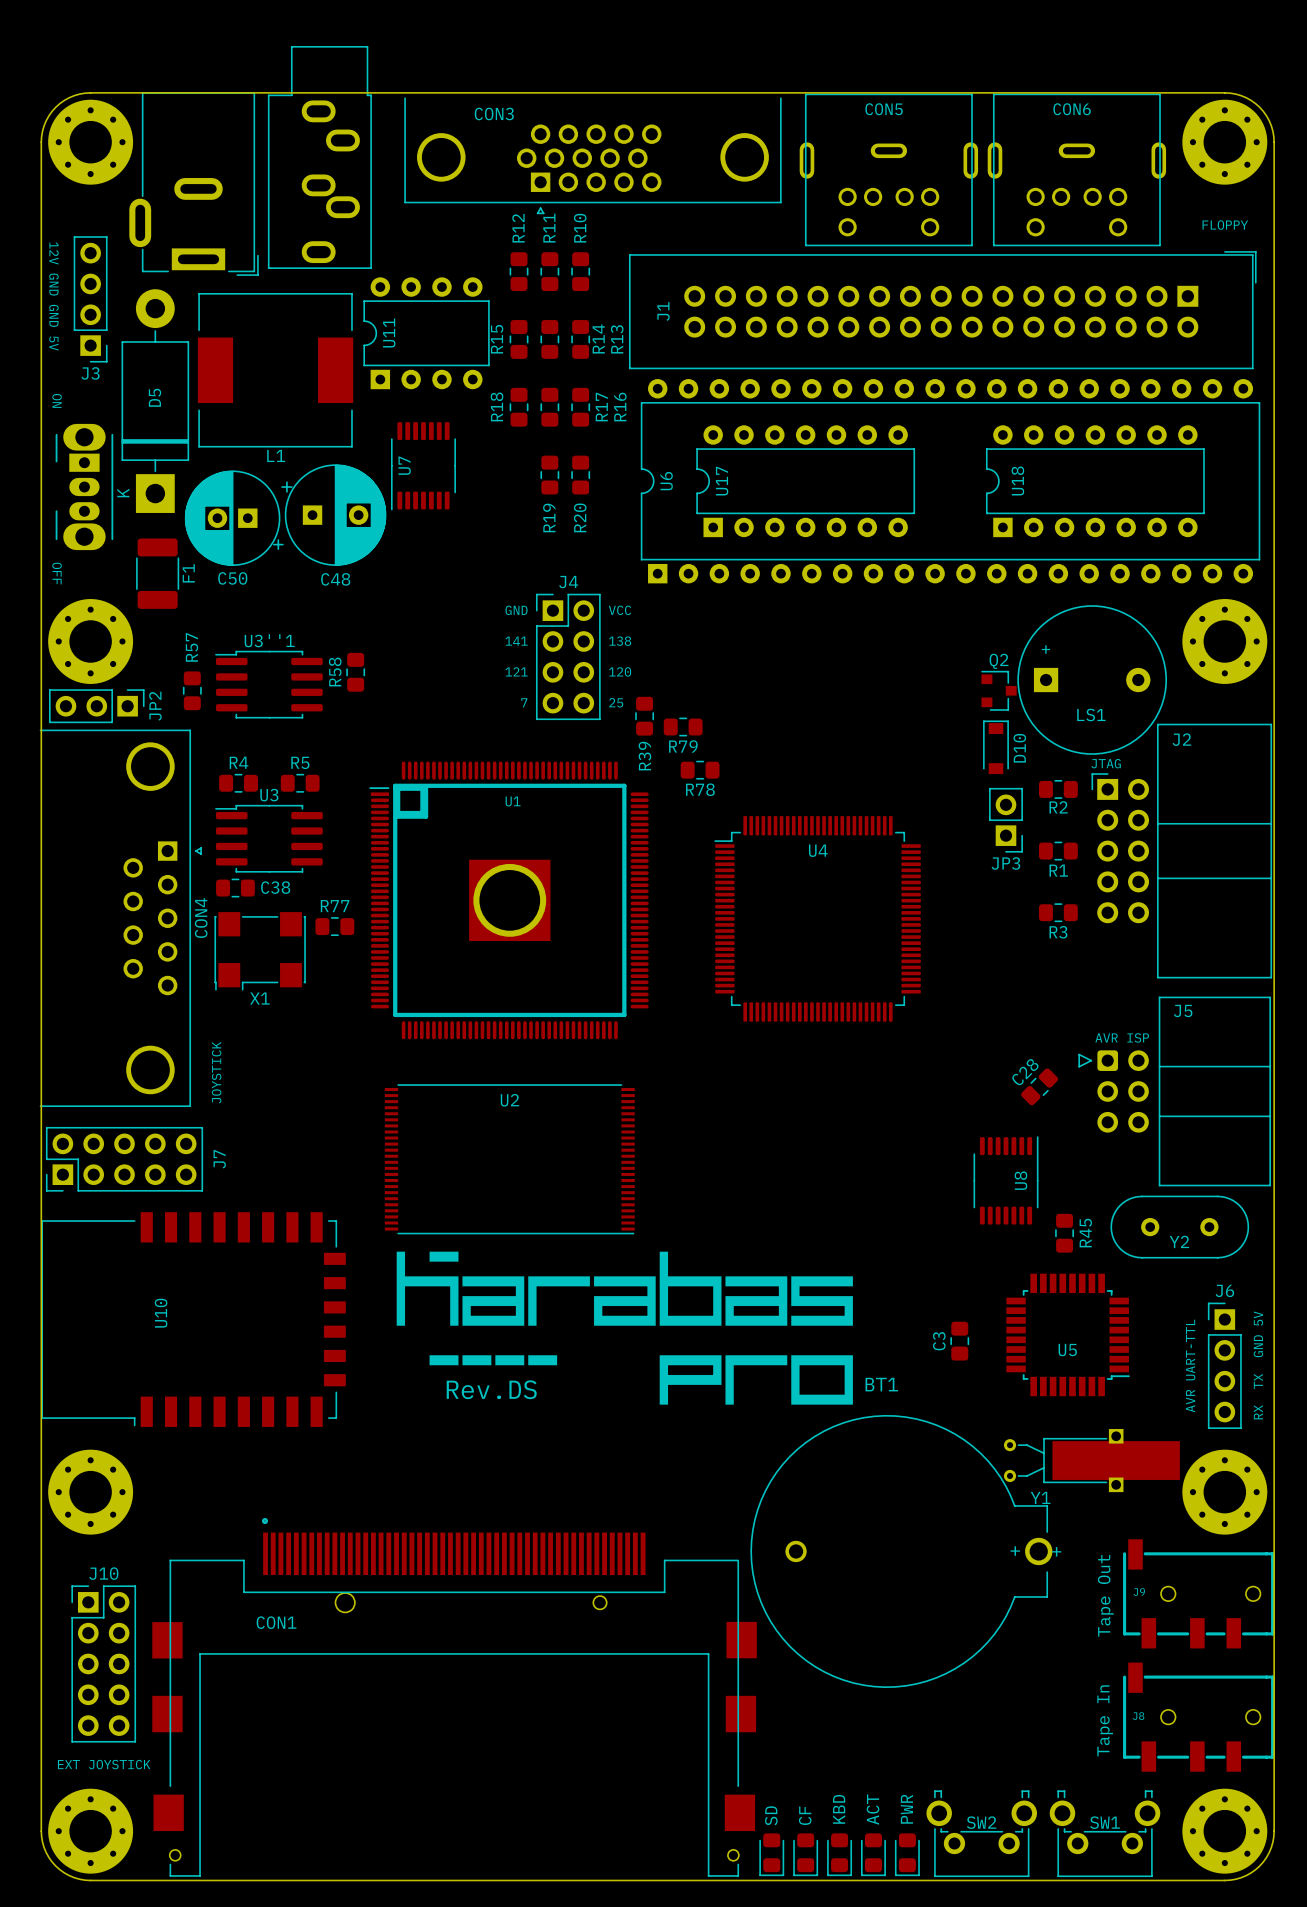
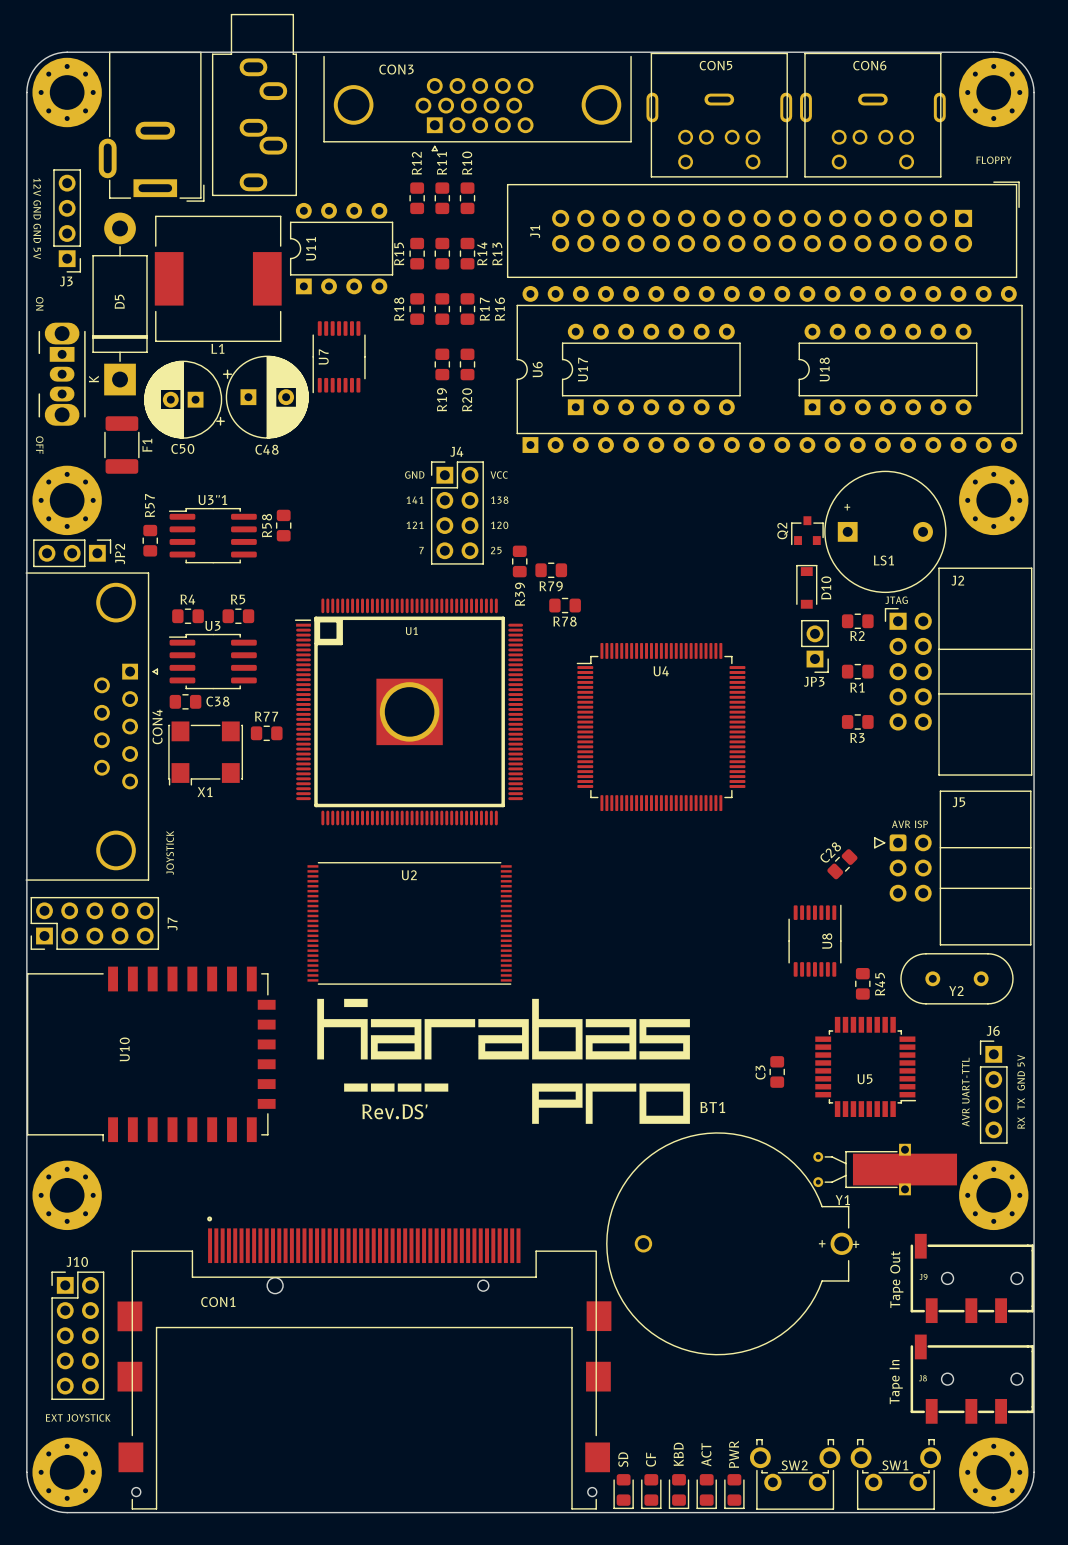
Q2 rotation: 0° (999, 690) -> 90° counterclockwise (807, 530)
text: Rev.DS (491, 1389) -> Rev.DS' (394, 1111)

